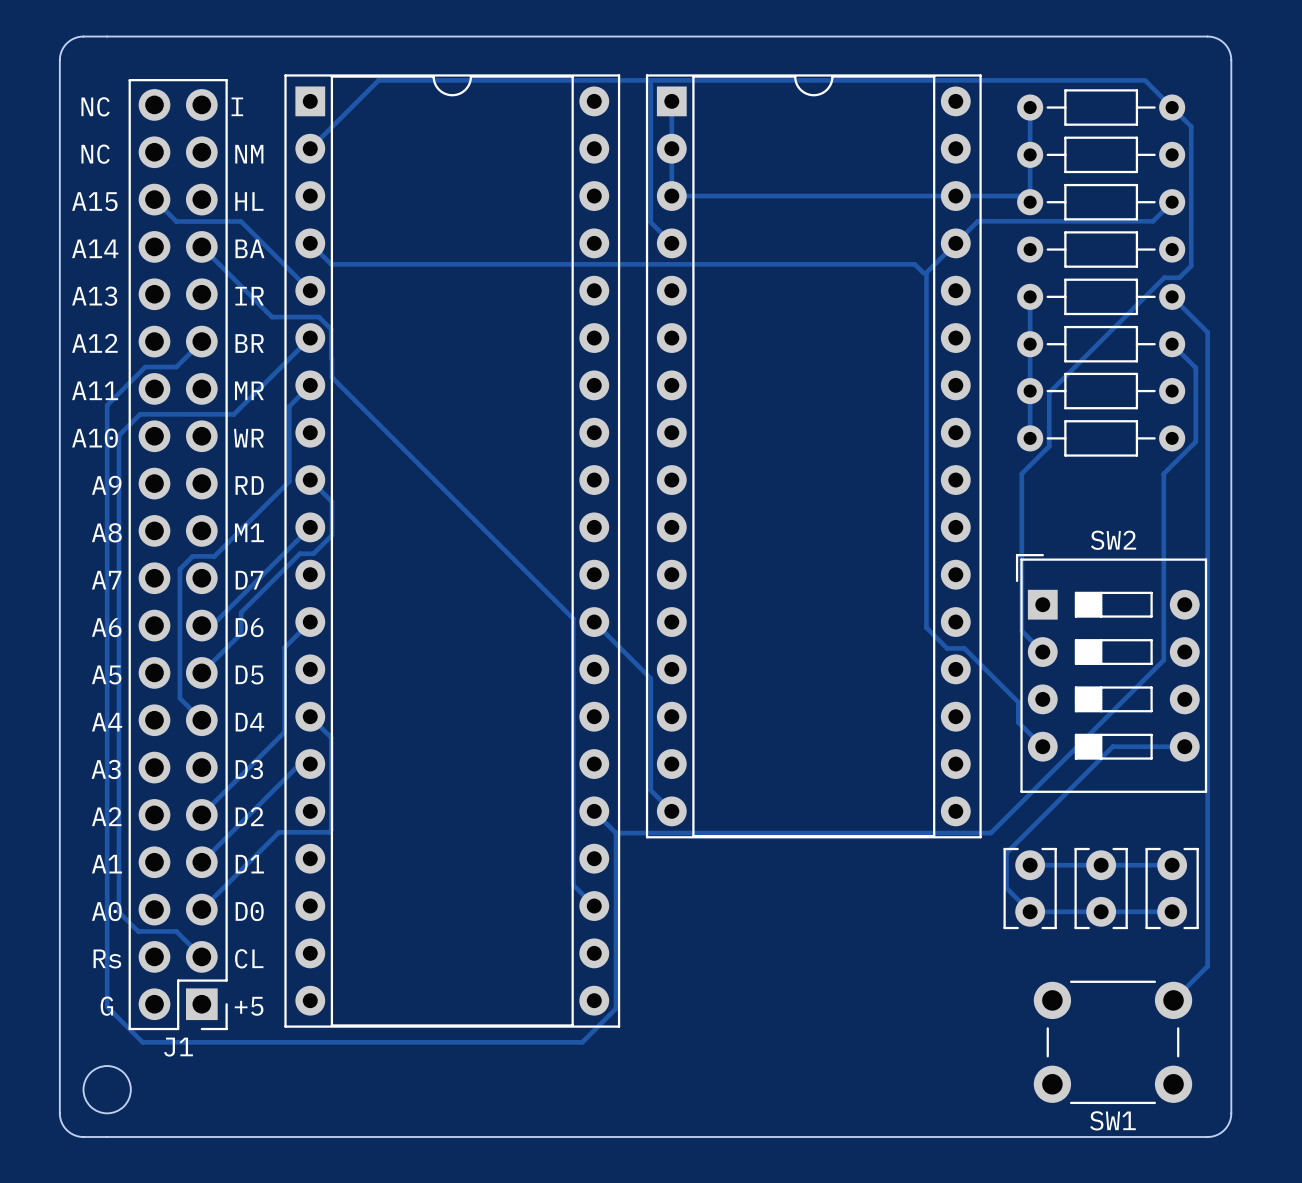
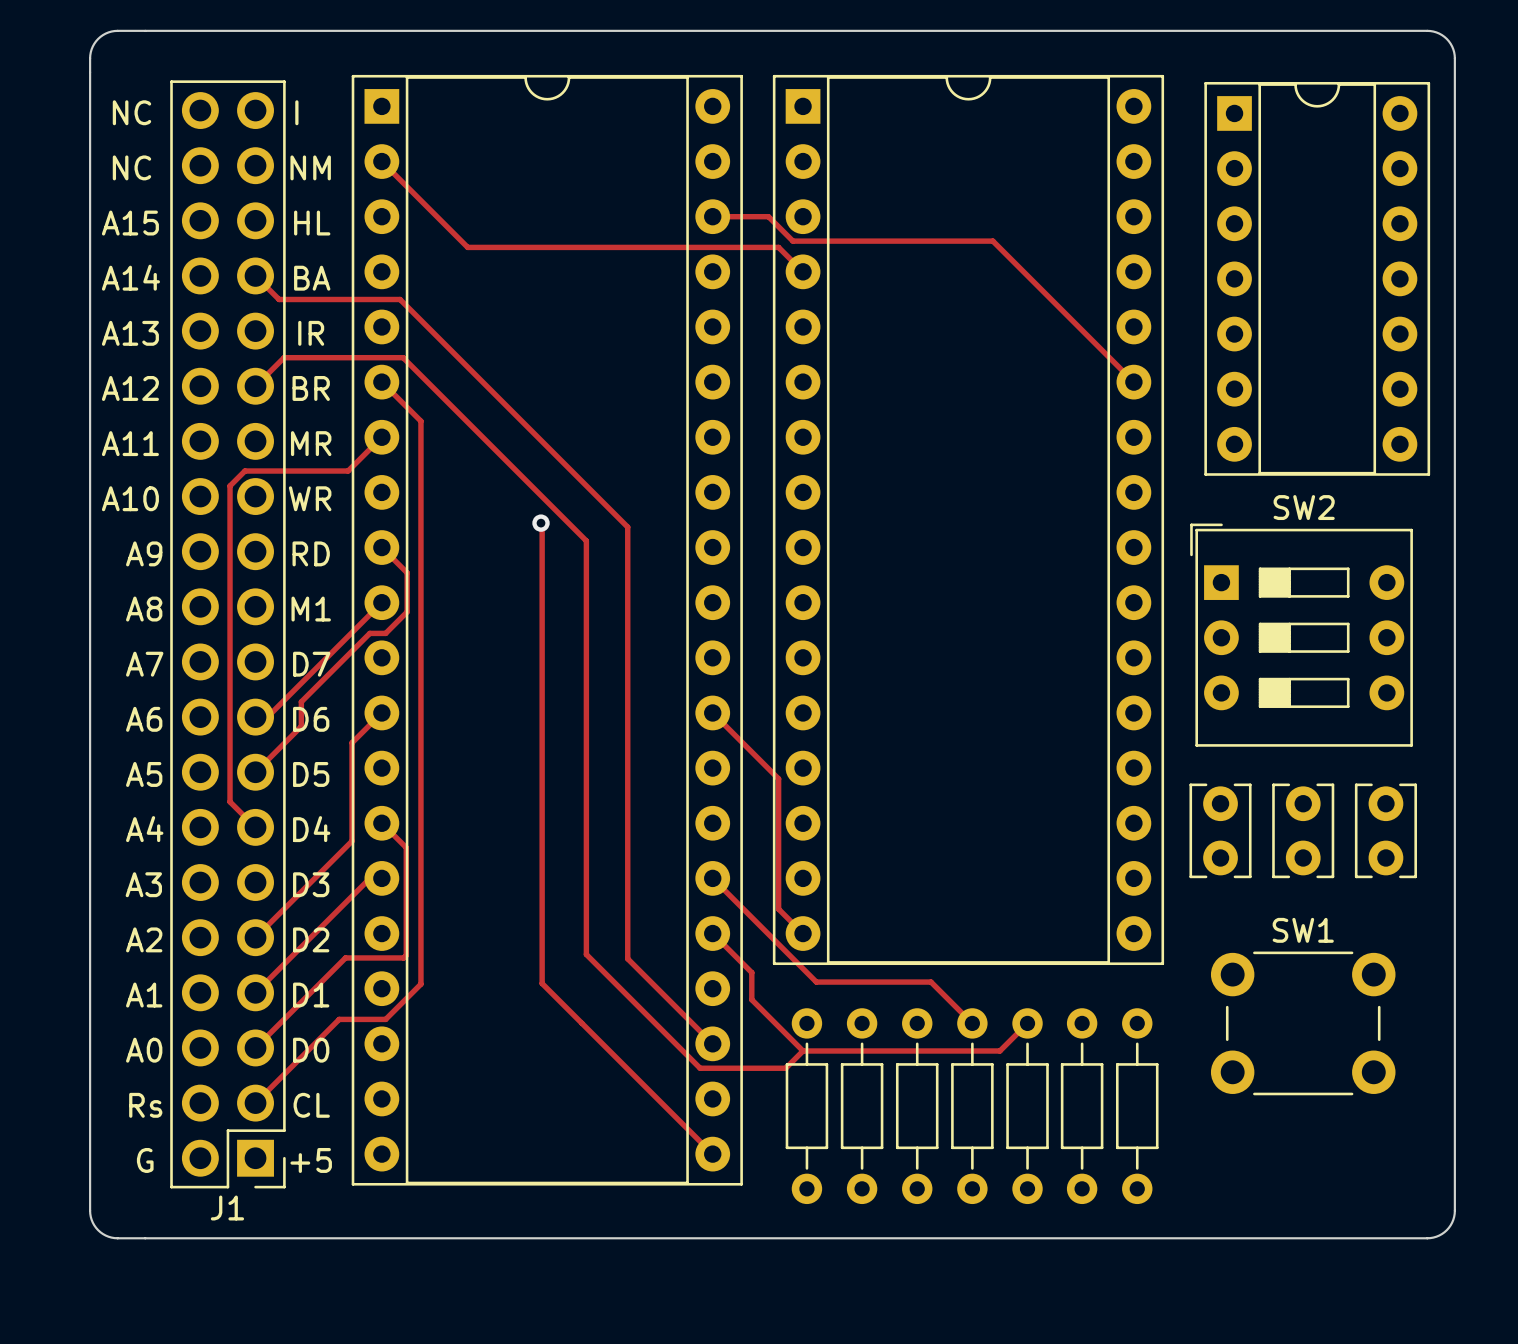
track: (650, 83) (650, 222) -> (381, 161) (467, 247) (778, 247)
track: (671, 101) (671, 196) (1024, 196) (1030, 202) (1030, 107) -> none
part: (1101, 107) -> none
track: (310, 148) (378, 80) (1145, 80) (1191, 126) (1191, 265) (1179, 277) (1164, 277) (1049, 392) (1049, 446) (1021, 473) (1021, 631) (1042, 652) -> none
part: (1101, 154) -> none
track: none -> (712, 216) (768, 216) (792, 241) (992, 241) (1133, 382)
track: (154, 199) (176, 221) (241, 221) (310, 290) -> none
part: (1101, 202) -> none
track: (1172, 202) (1153, 221) (977, 221) (926, 272) (926, 627) (947, 648) (964, 648) (1018, 702) (1018, 722) (1042, 746) -> none
part footprint: [1017, 231, 1186, 268] -> [1204, 81, 1431, 476]
track: (310, 243) (331, 264) (914, 264) (923, 273) -> none
track: (222, 267) (271, 317) -> (255, 386) (284, 357) (337, 357)
track: none -> (279, 299) (400, 299) (627, 527) (627, 958) (688, 1019)
track: (1030, 296) (1030, 438) -> none
part: (1101, 296) -> none
track: (1172, 296) (1207, 332) (1207, 966) (1173, 1000) -> none
track: (318, 317) (331, 329) (332, 377) (573, 618) (573, 885) -> (391, 357) (403, 357) (586, 540) (586, 954) (700, 1068) (785, 1068) (803, 1050)
track: (310, 338) (233, 414) -> (357, 461) (348, 471) (292, 471)
track: (201, 341) (176, 367) (145, 367) (107, 405) (107, 1006) (142, 1042) (582, 1042) (615, 1008) (615, 833) (990, 833) (1163, 660) (1163, 473) (1195, 441) (1195, 367) (1172, 344) -> none
part: (1101, 344) -> none
part: (1101, 391) -> none
track: (289, 406) (289, 481) (214, 556) (192, 556) (179, 569) -> (244, 471) (230, 485) (230, 651)
track: (192, 414) (140, 414) (119, 435) (119, 912) (138, 931) (176, 931) (201, 956) -> (381, 382) (420, 421) (420, 984) (385, 1019) (339, 1019) (255, 1103)
part: (1101, 438) -> none
via: none -> (541, 523)
track: none -> (542, 523) (542, 983) (712, 1154)
SW2 footprint: [1015, 554, 1208, 793] -> [1190, 523, 1413, 747]
part: none -> (1220, 830)
part: none -> (1303, 830)
part: none -> (1385, 830)
track: (1184, 746) (1112, 746) (1006, 853) (1006, 888) (1030, 911) (1172, 911) -> none
track: none -> (712, 878) (816, 982) (931, 982) (972, 1023)
track: none -> (738, 958) (751, 972) (751, 999) (803, 1050)
track: (1030, 865) (1172, 865) -> none
track: none -> (1027, 1023) (999, 1050) (803, 1050)
part: (1030, 888) -> none
part: (1101, 888) -> none
part: (1172, 888) -> none
part: none -> (806, 1106)
part: none -> (862, 1106)
part: none -> (917, 1106)
part: none -> (972, 1106)
part: none -> (1027, 1106)
part: none -> (1082, 1106)
part: none -> (1137, 1106)
SW1 position: (1112, 1042) -> (1303, 1023)
board edge: (59, 1049) (60, 1118) (68, 1131) (83, 1137) (1210, 1136) (1224, 1130) (1230, 1118) (1231, 1049) -> (90, 1210) (92, 1222) (98, 1230) (105, 1235) (117, 1238) (1427, 1238) (1436, 1236) (1446, 1230) (1452, 1222) (1454, 1210)
round board edge: [82, 1065, 132, 1115] -> none
SW1 name position: SW1 (1112, 1120) -> SW1 (1303, 930)

